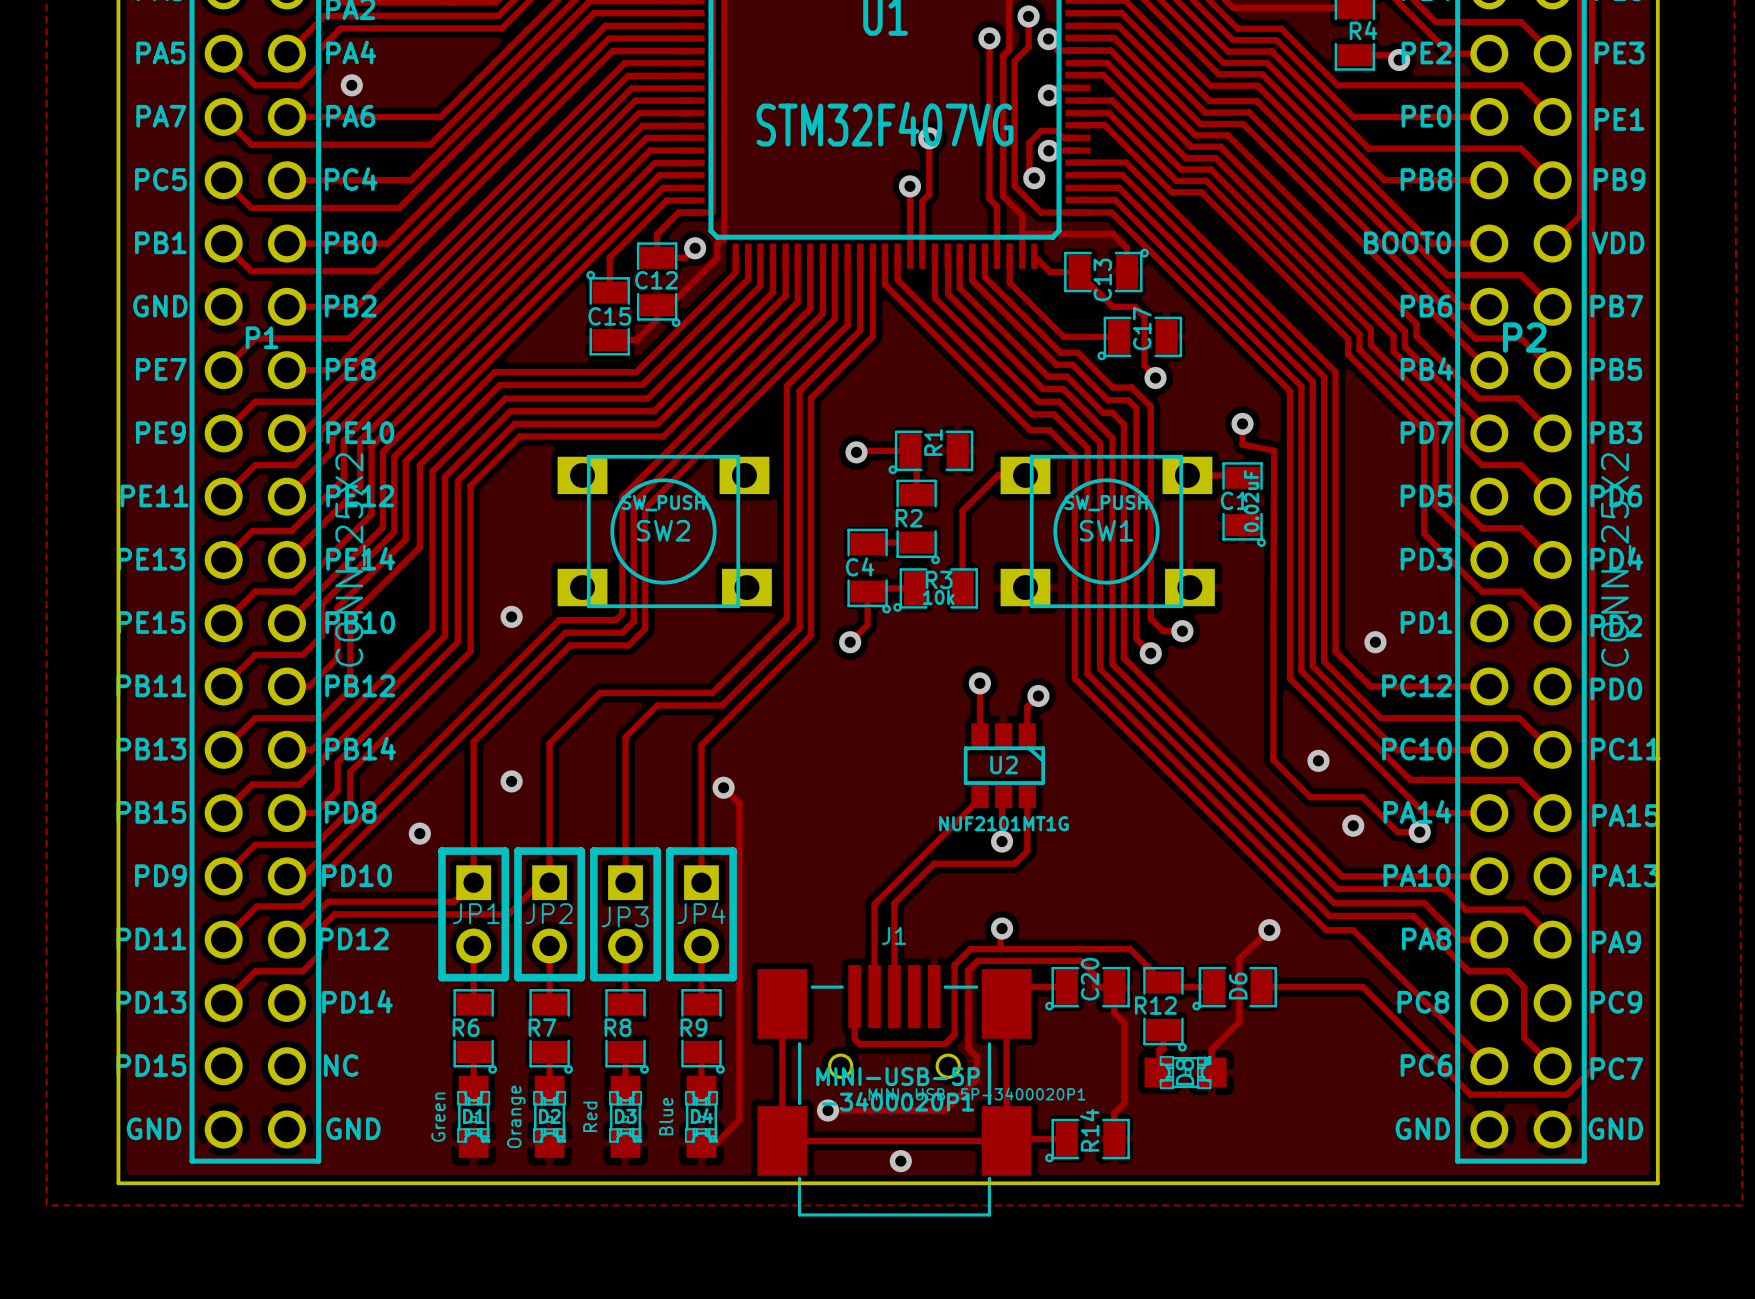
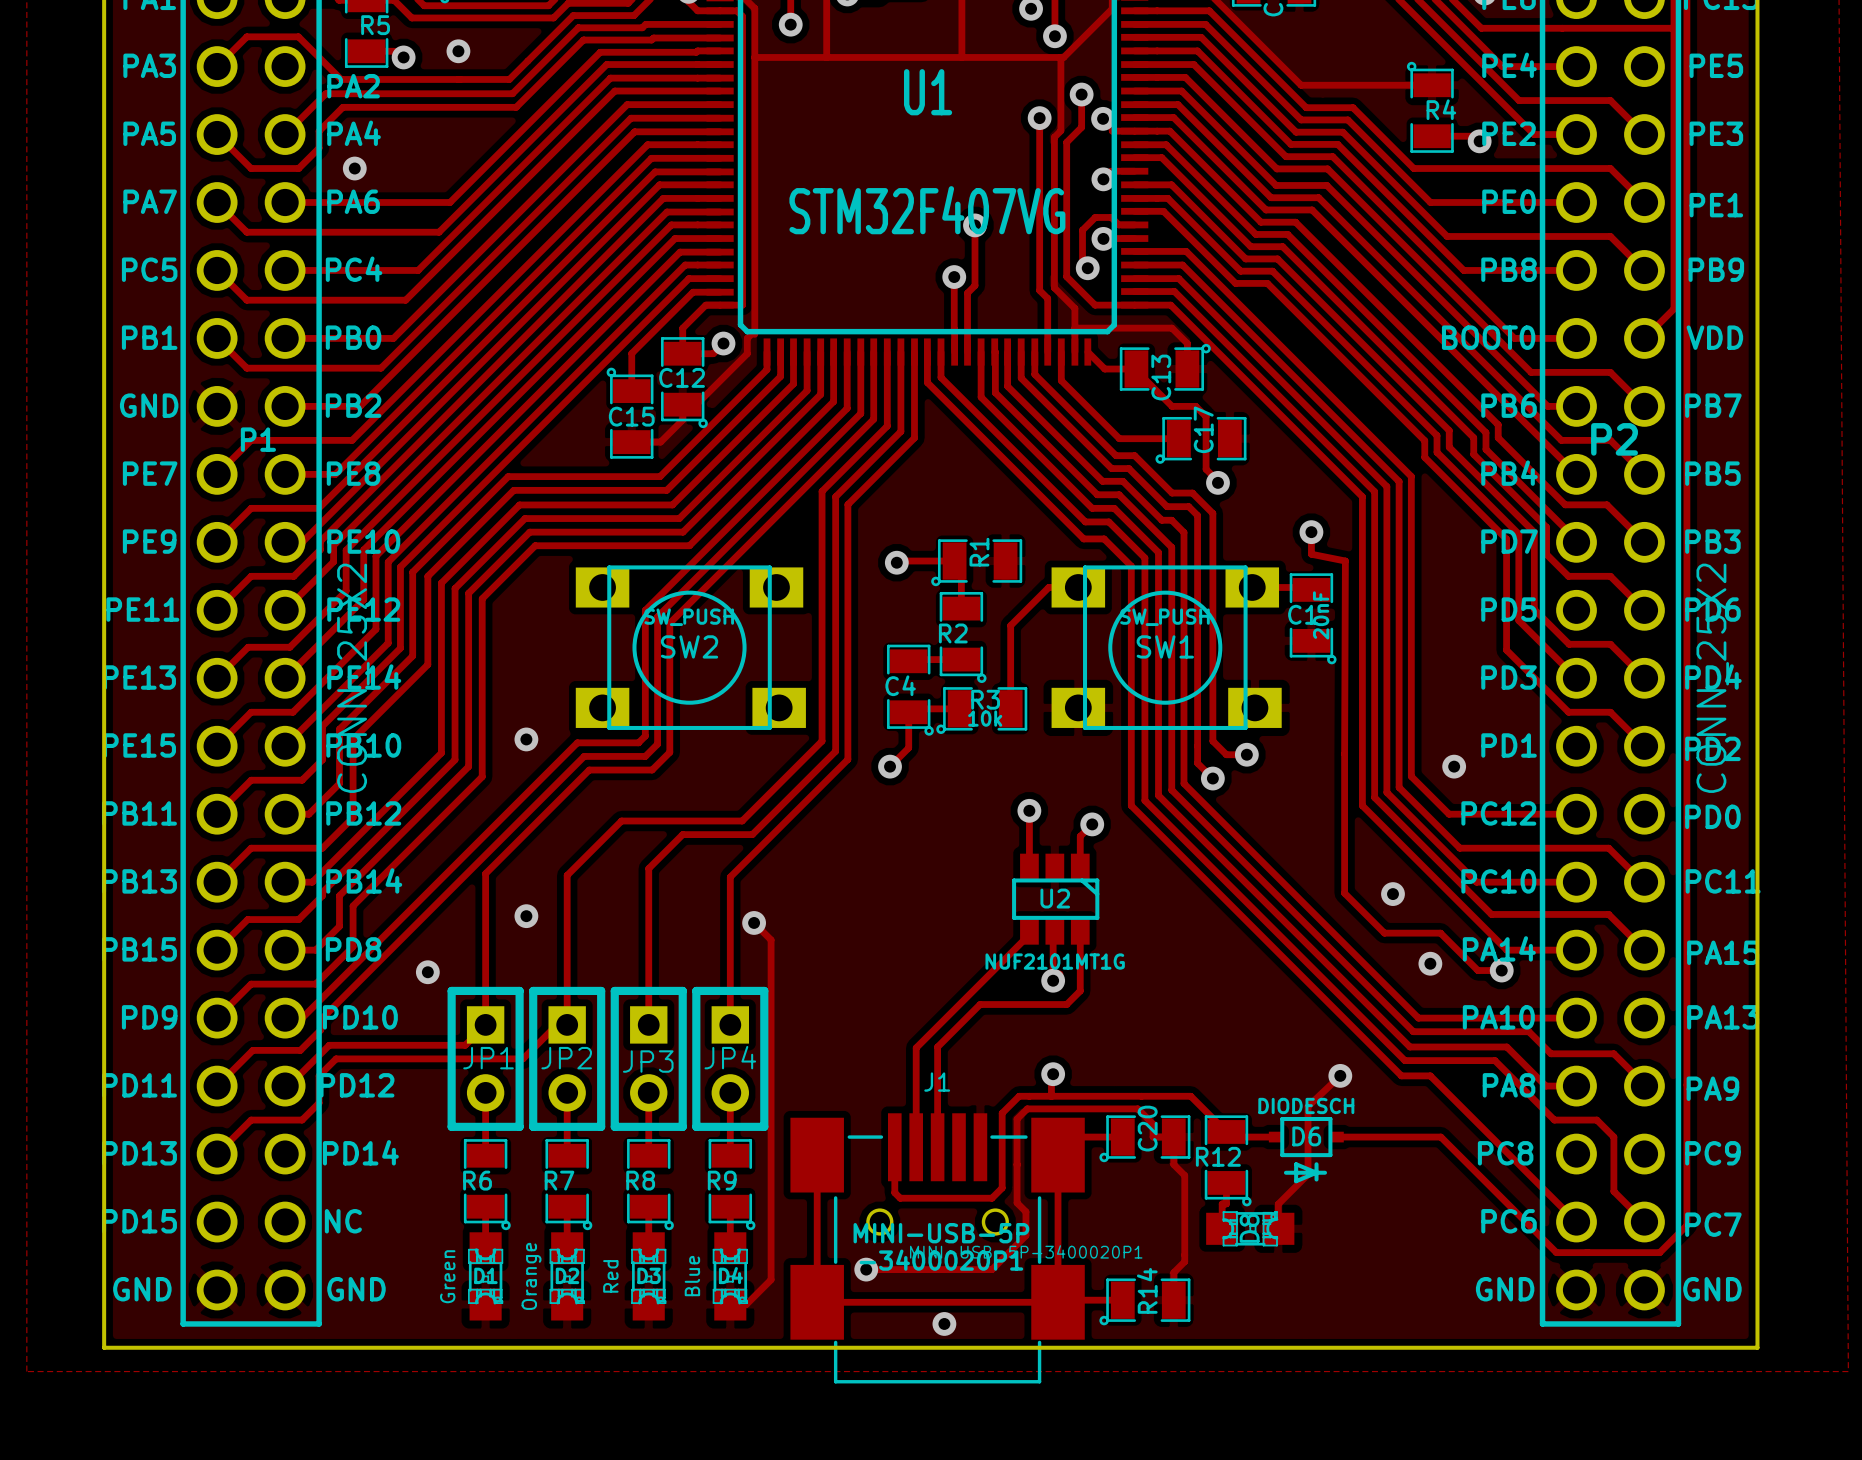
C1 value: 0.02uF (1251, 501) -> 20nF (1321, 615)
D6 value: none -> DIODESCH (1306, 1105)
D6 footprint: [1192, 966, 1277, 1011] -> [1268, 1116, 1344, 1184]
D6 name rotation: 0° (1238, 986) -> 90° clockwise (1306, 1136)

